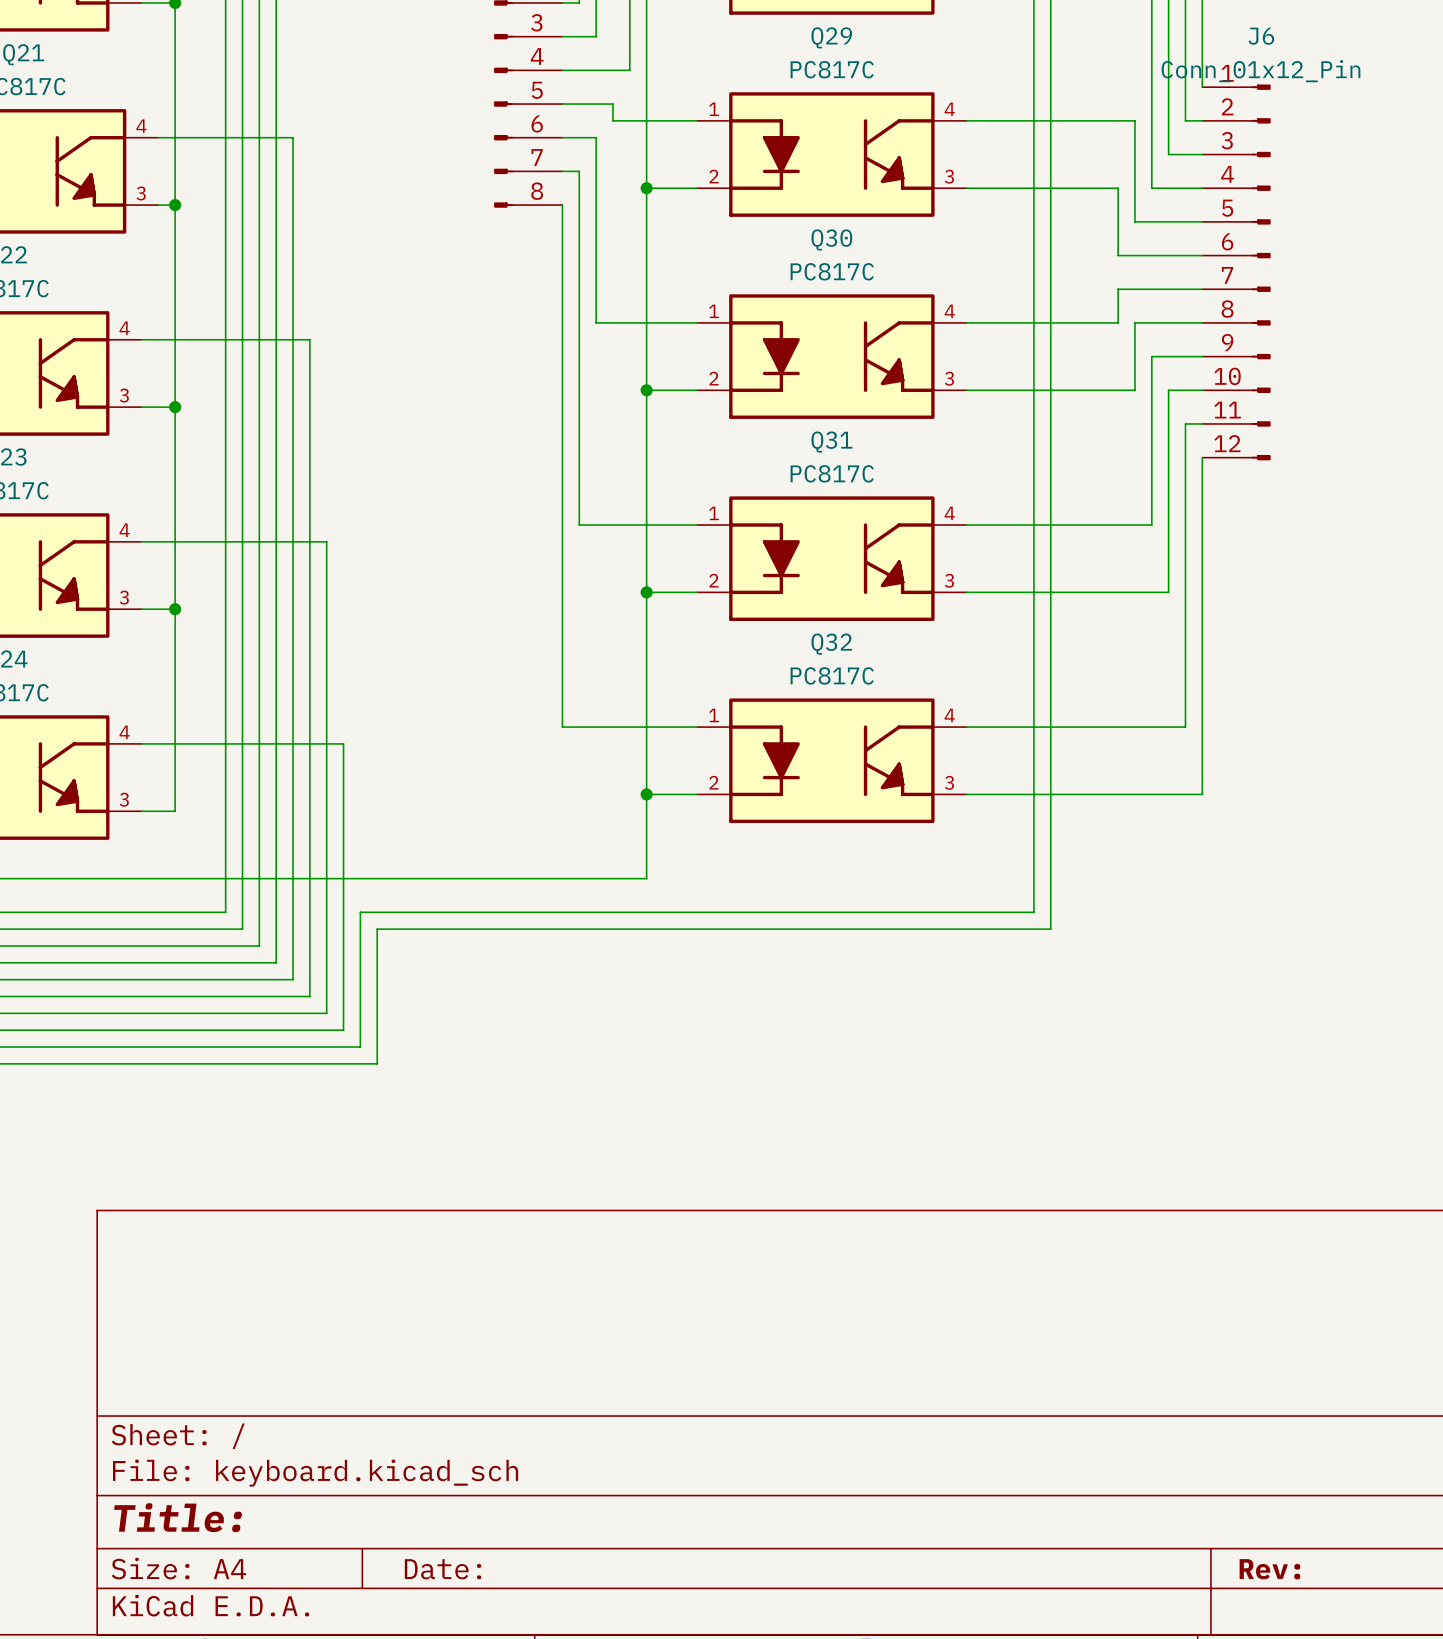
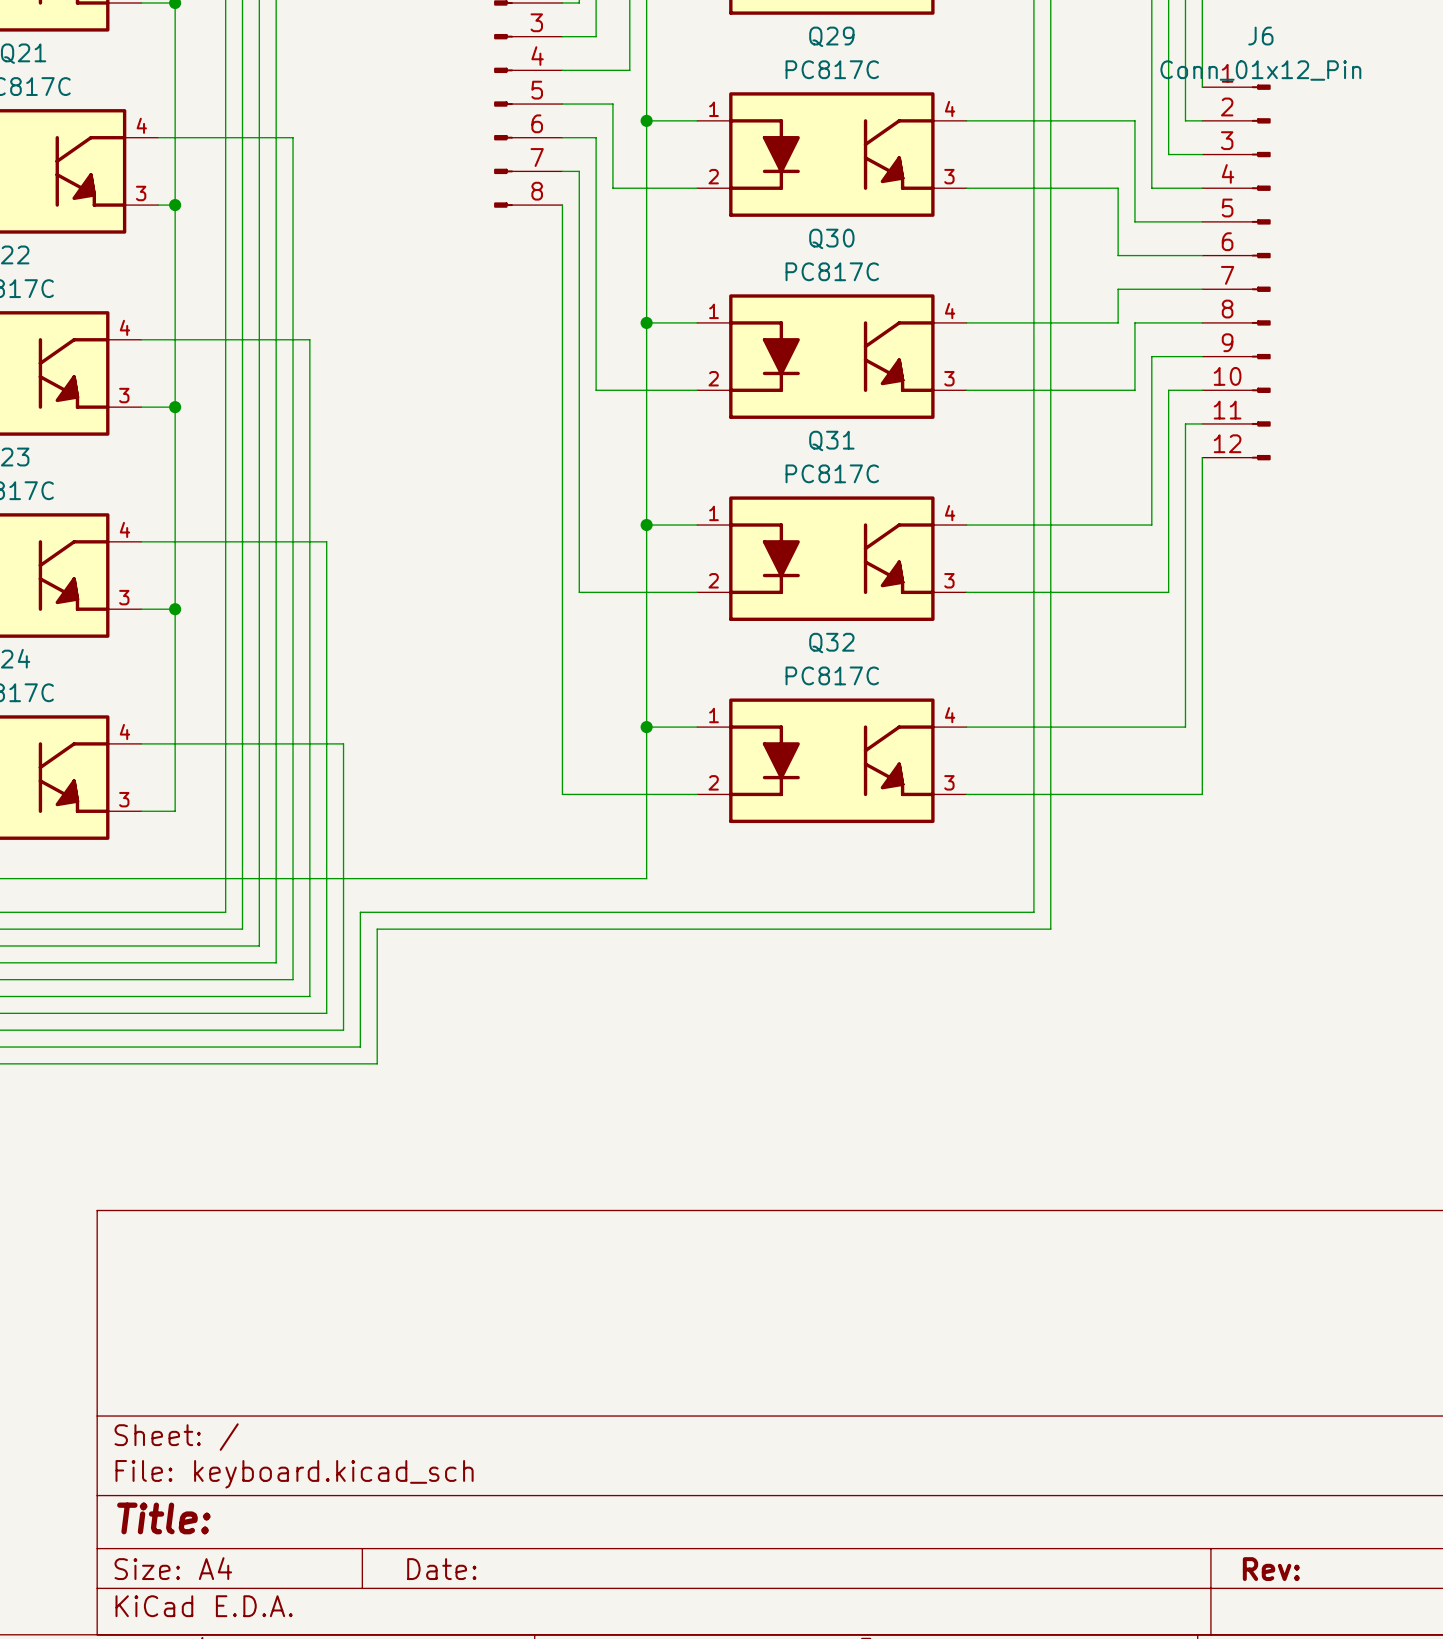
wire: (612, 120) (646, 120) -> (612, 120) (612, 188) (646, 188)
junction: none -> (646, 120)
junction: (646, 188) -> none
wire: (596, 322) (646, 322) -> (596, 322) (596, 390) (646, 390)
junction: none -> (646, 322)
junction: (646, 390) -> none
wire: (579, 525) (646, 525) -> (579, 525) (579, 592) (646, 592)
junction: none -> (646, 525)
junction: (646, 592) -> none
wire: (562, 727) (646, 727) -> (562, 727) (562, 794) (646, 794)
junction: none -> (646, 727)
junction: (646, 794) -> none

